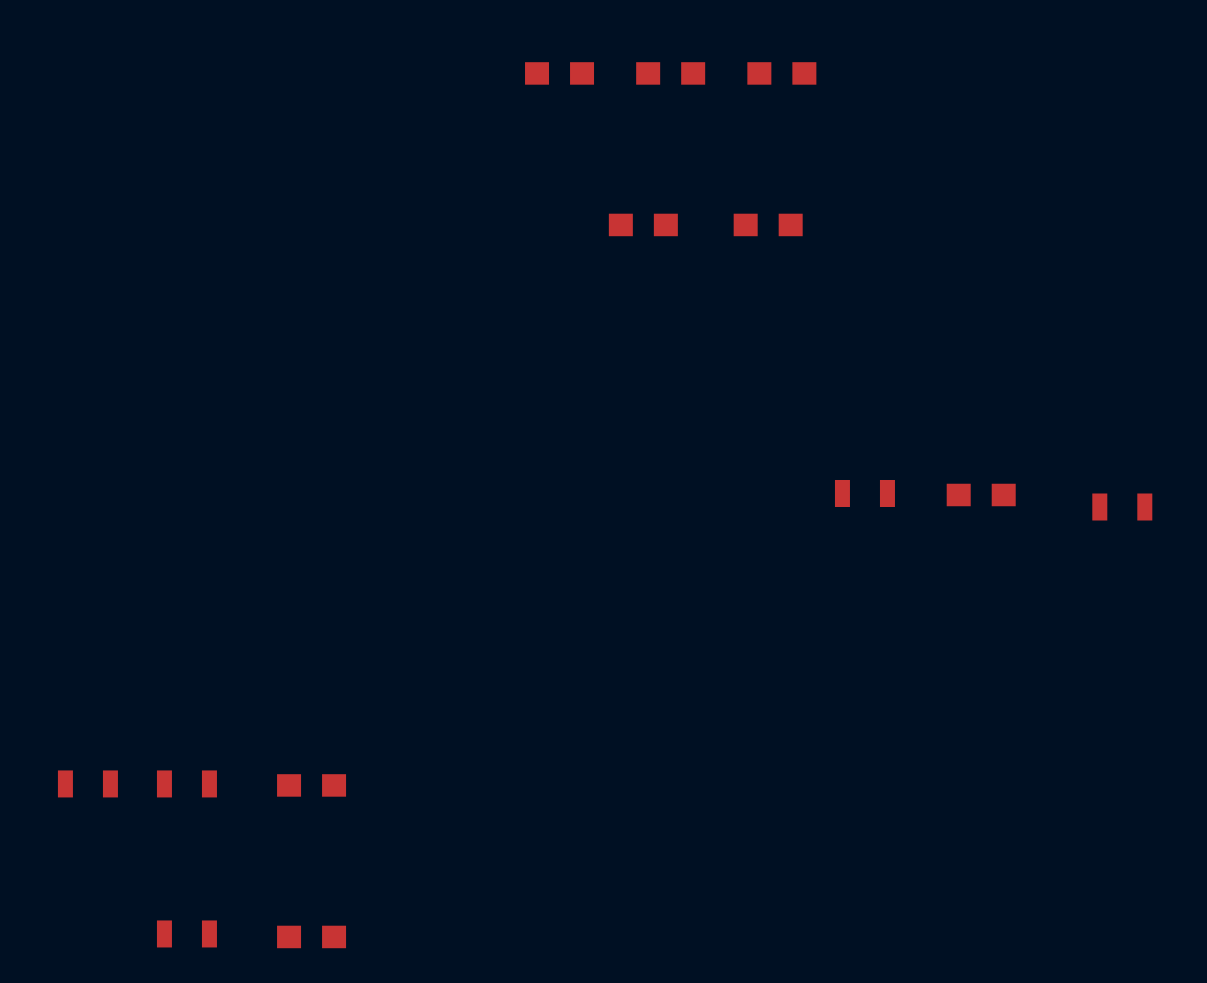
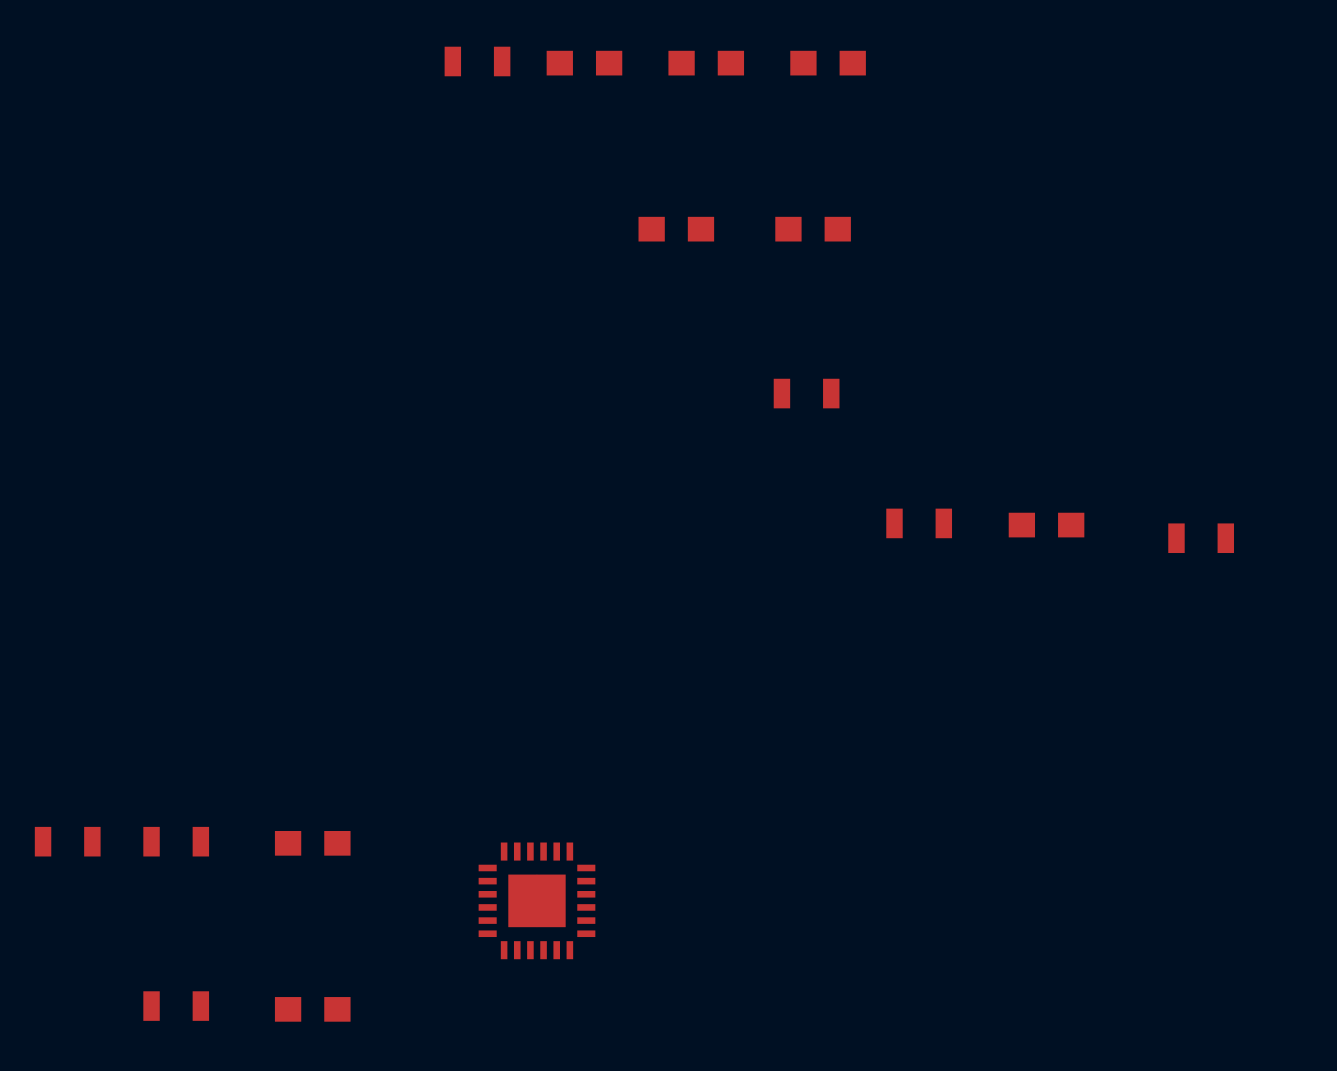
part: none -> (477, 61)
part: none -> (806, 393)
part: none -> (536, 900)

